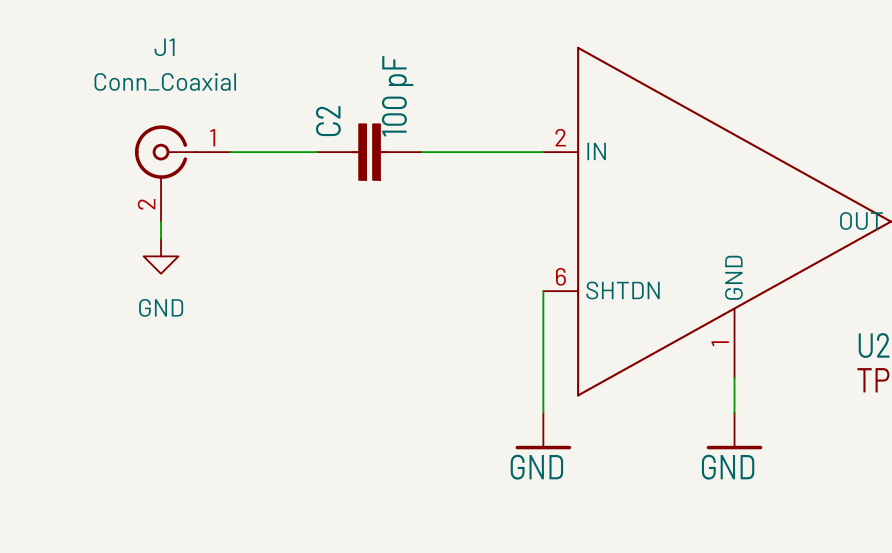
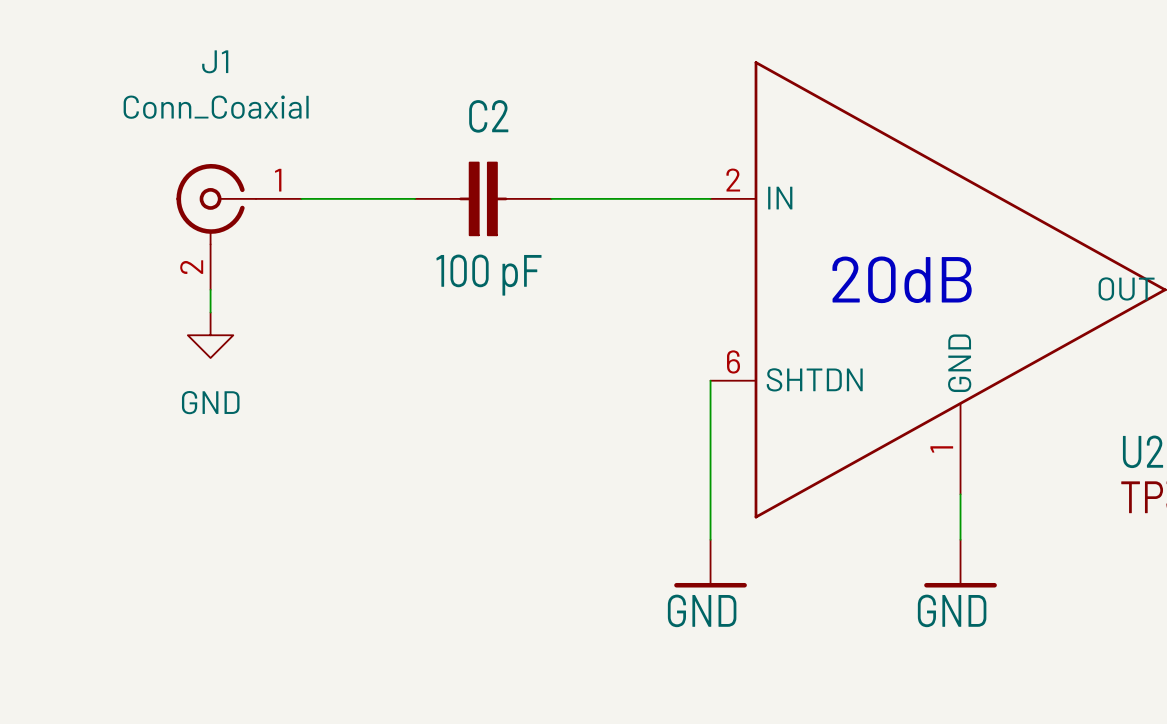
C2 value rotation: 0° (397, 96) -> 90° clockwise (488, 275)
C2 value position: 100 pF (397, 96) -> 100 pF (488, 275)
C2 name rotation: 0° (328, 121) -> 90° clockwise (488, 116)
text: none -> 20dB (902, 279)

